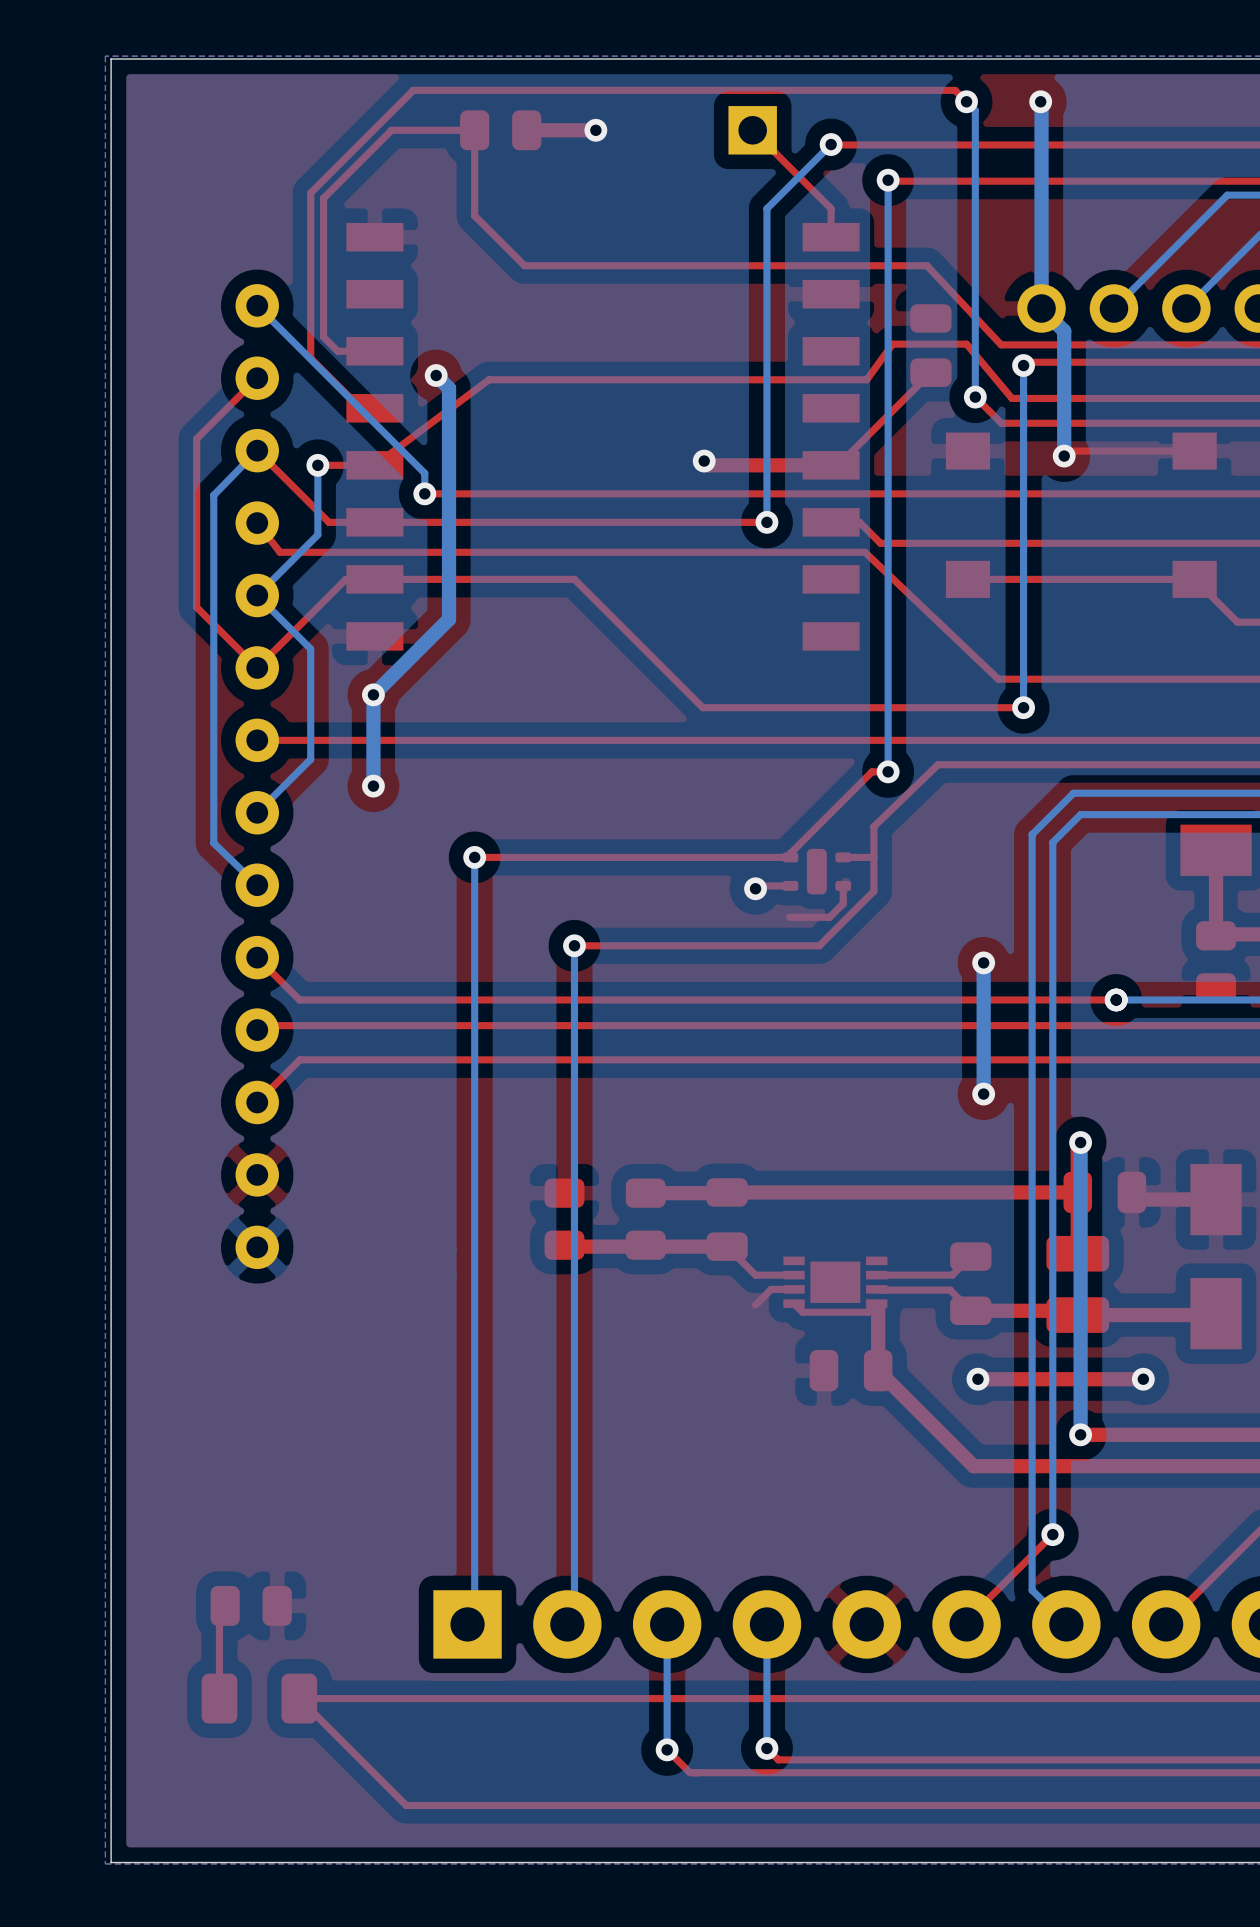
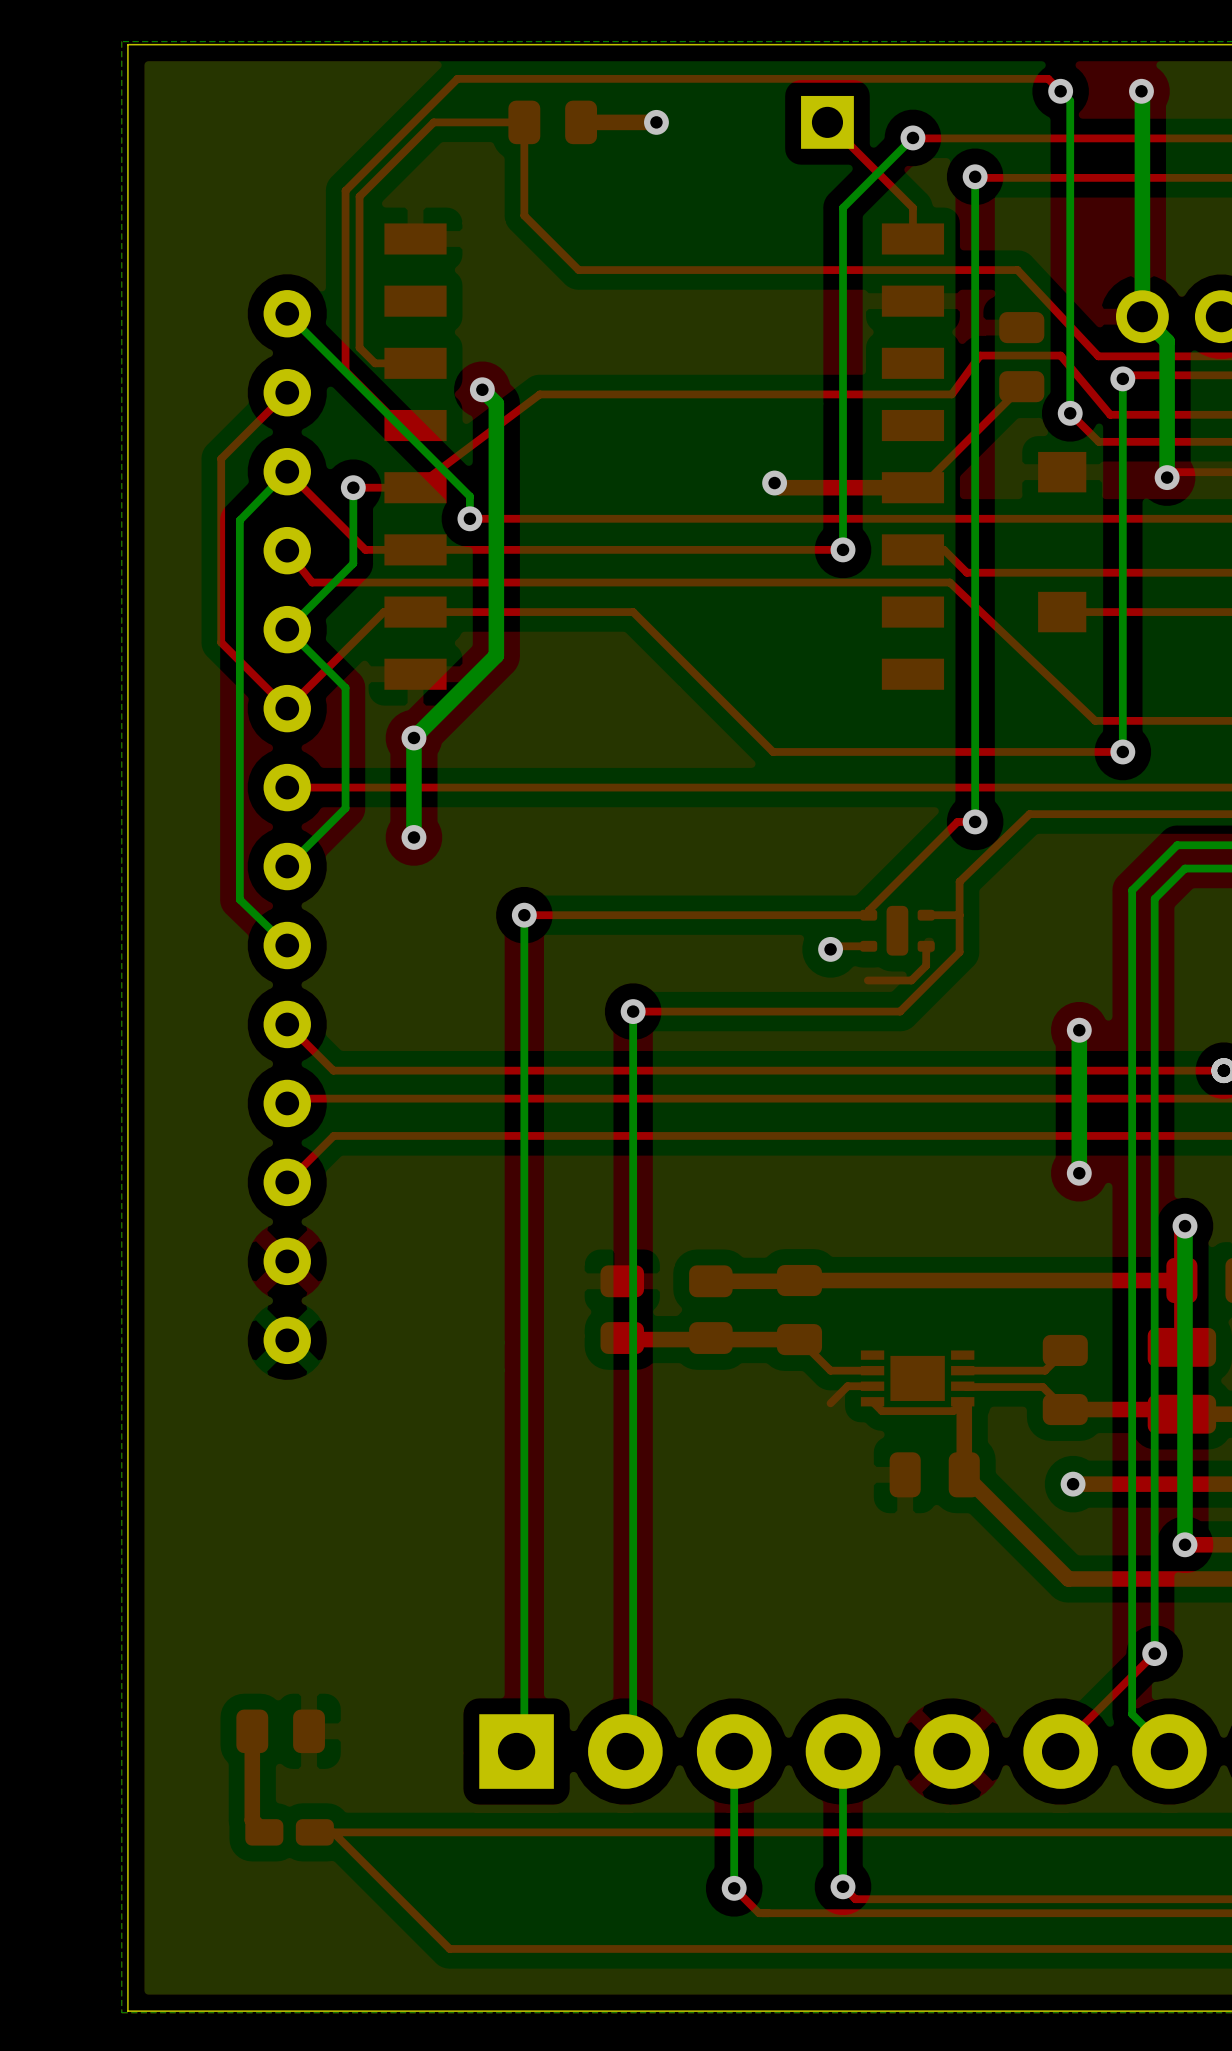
top track: none -> (252, 1731) (252, 1820) (264, 1832)
top track: (219, 1618) (219, 1698) -> none
part footprint: [201, 1673, 318, 1724] -> [245, 1819, 334, 1846]

